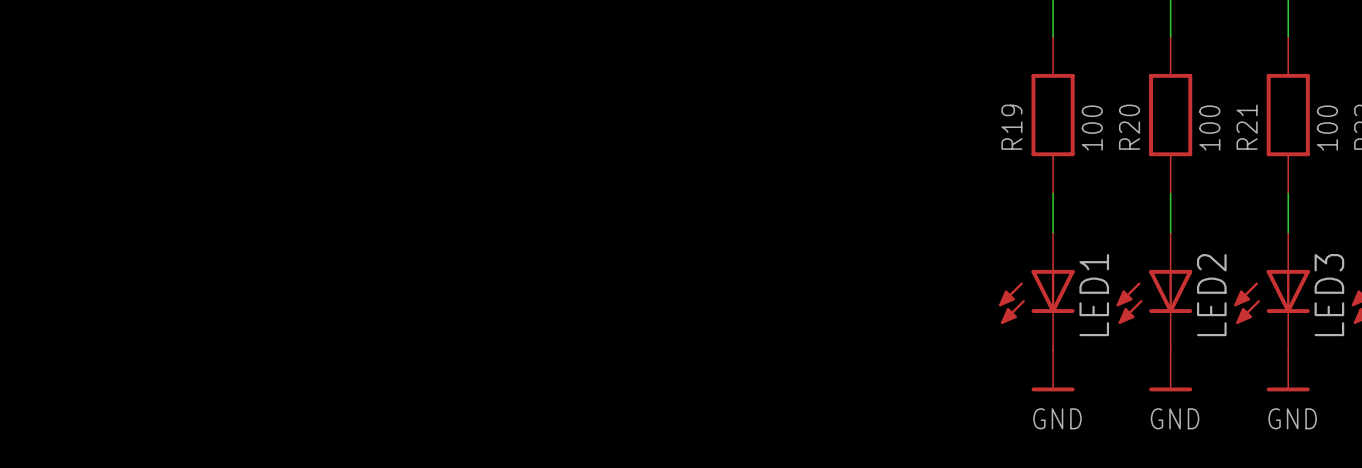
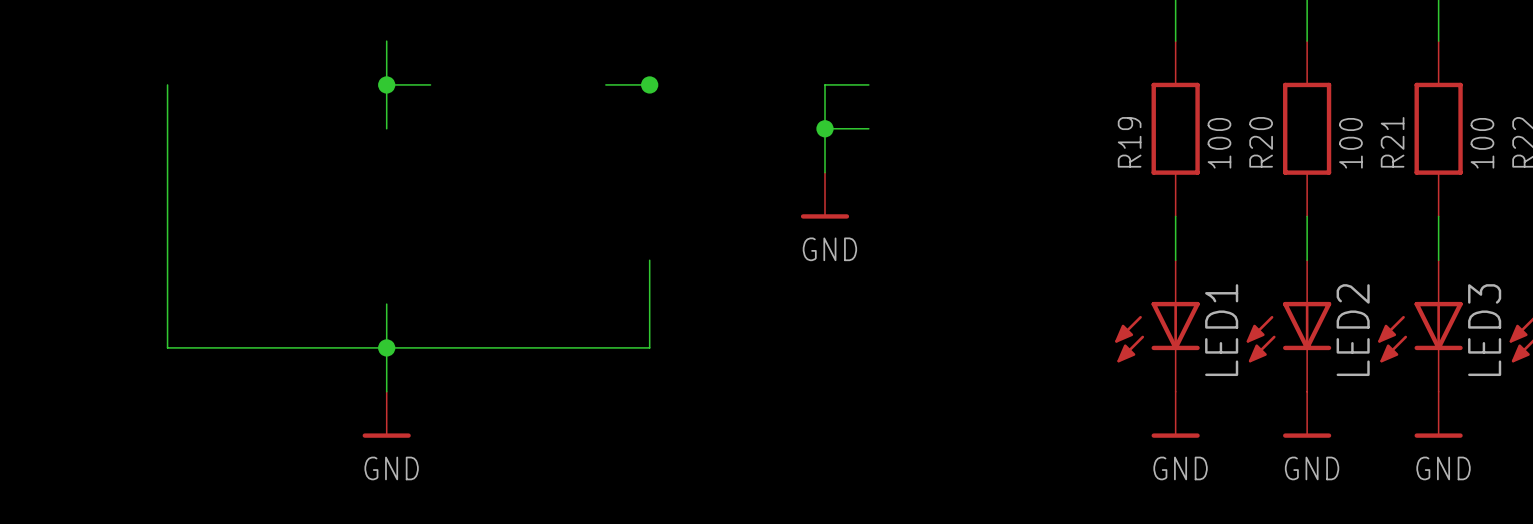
wire: none -> (386, 41) (386, 128)
wire: none -> (167, 84) (167, 347) (649, 347) (649, 260)
wire: none -> (386, 84) (430, 84)
junction: none -> (386, 84)
wire: none -> (605, 84) (649, 84)
junction: none -> (649, 84)
wire: none -> (868, 84) (825, 84) (825, 172)
wire: none -> (825, 128) (868, 128)
junction: none -> (825, 128)
power symbol: none -> GND (825, 195)
wire: none -> (386, 304) (386, 391)
junction: none -> (386, 347)
power symbol: none -> GND (386, 414)

